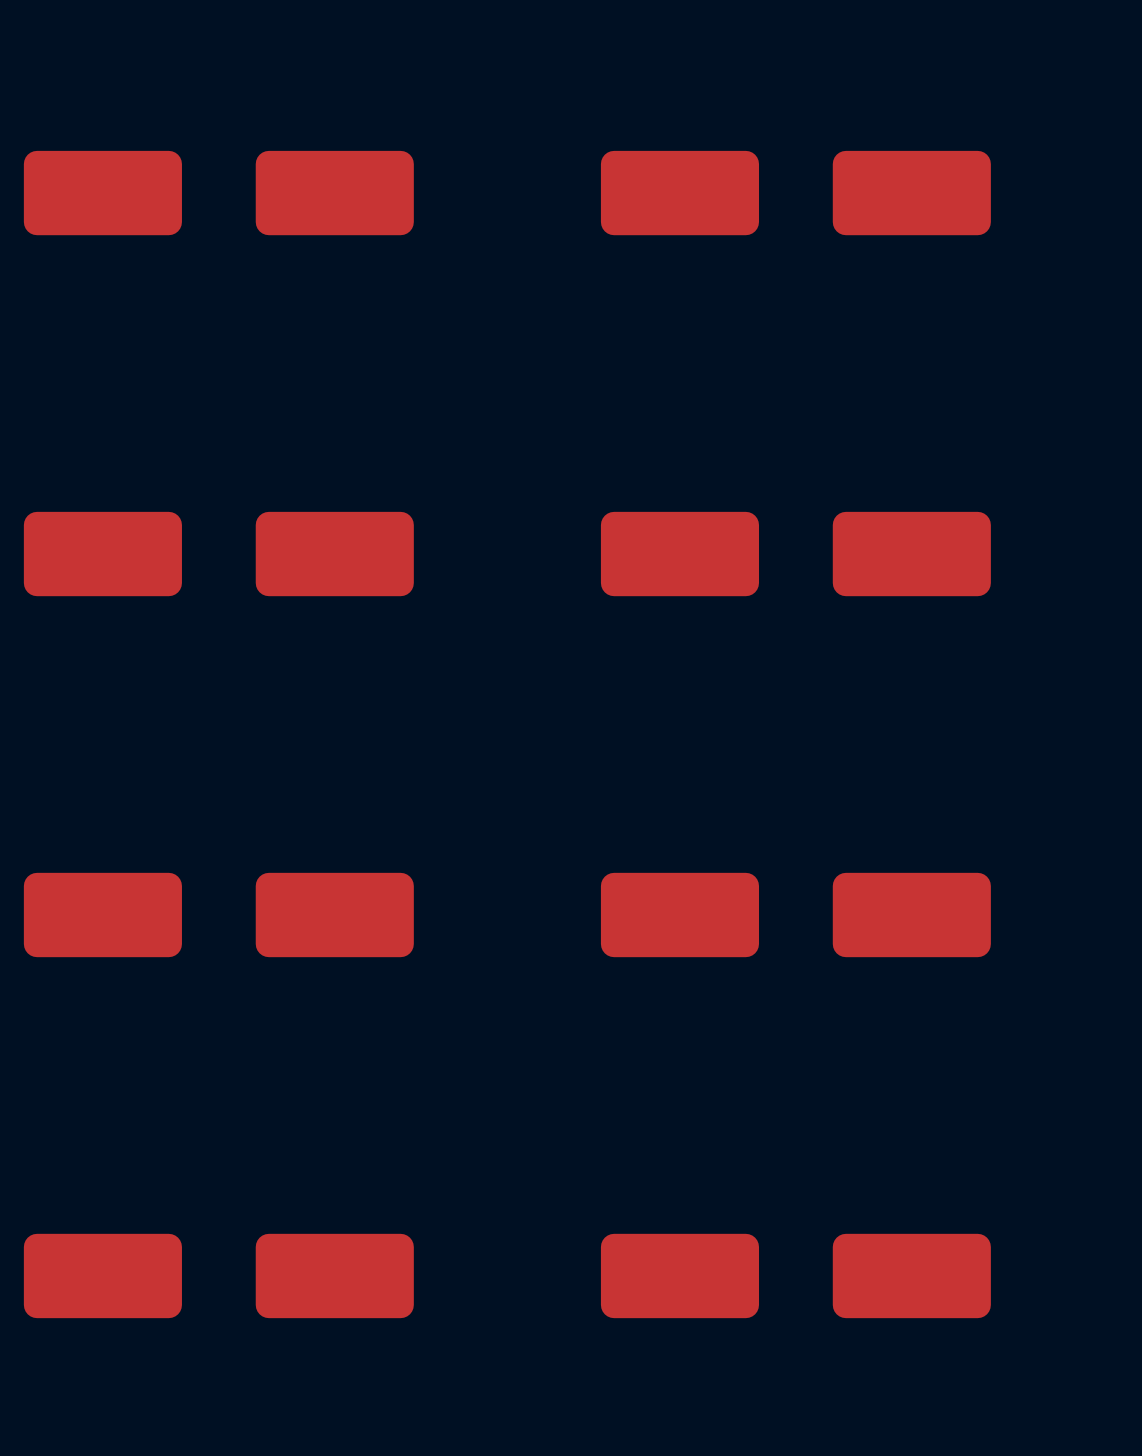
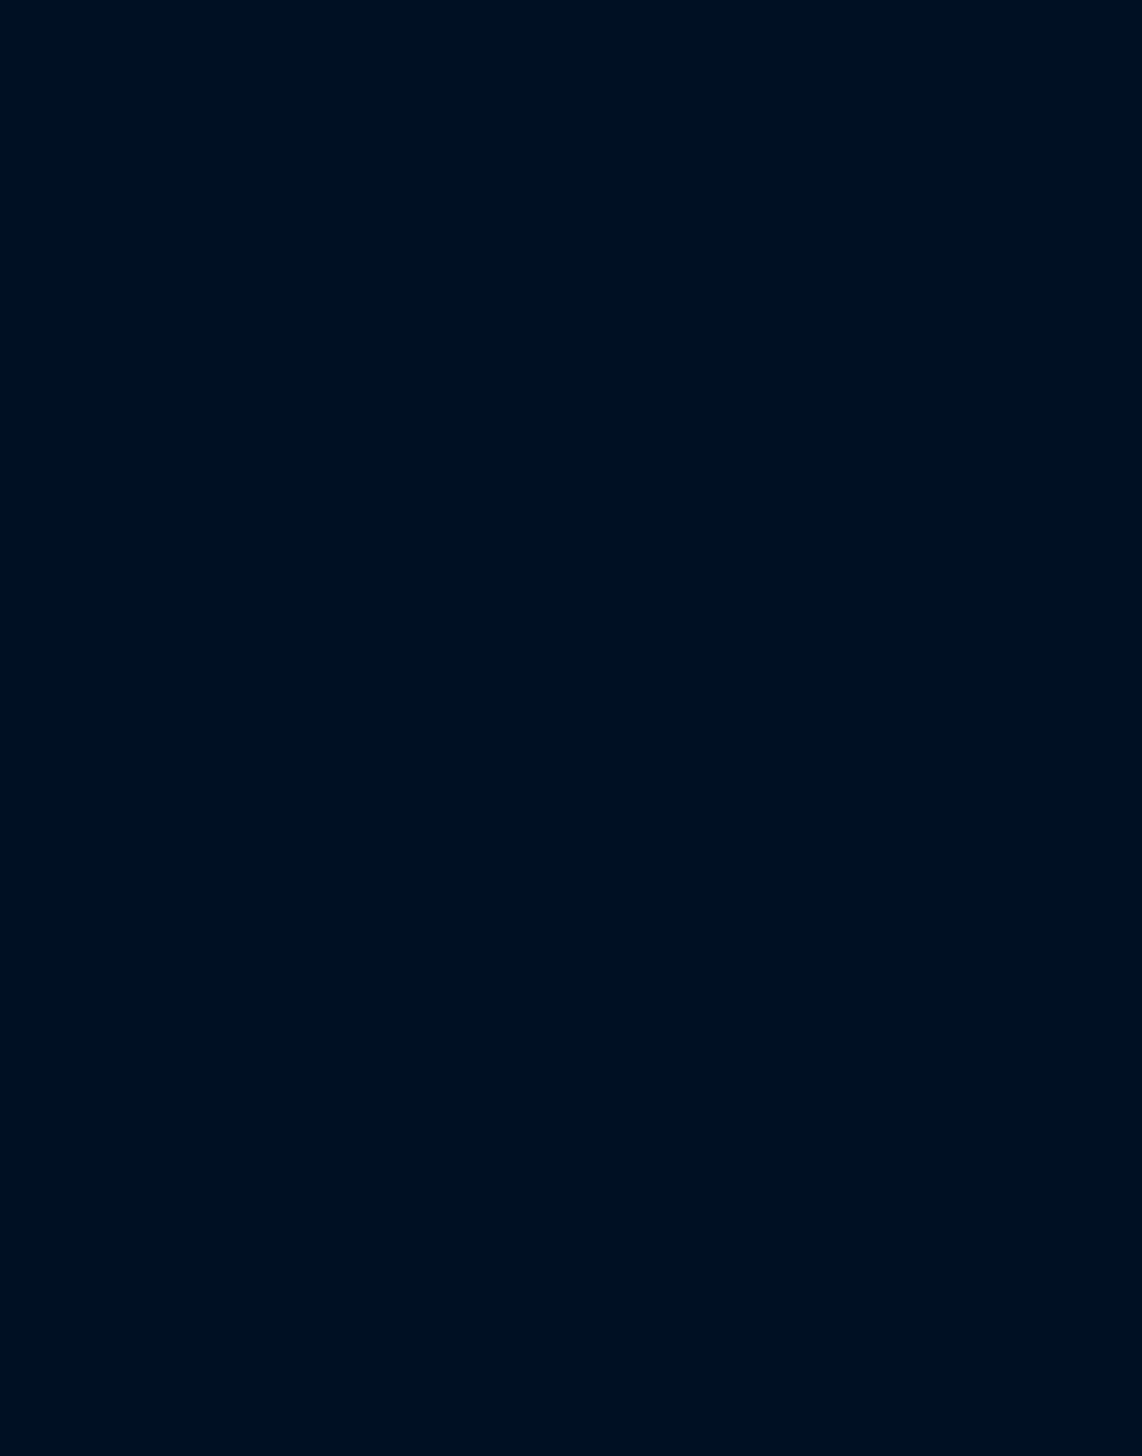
part: (218, 193) -> none
part: (795, 193) -> none
part: (218, 554) -> none
part: (795, 554) -> none
part: (218, 915) -> none
part: (795, 915) -> none
part: (218, 1275) -> none
part: (795, 1275) -> none

